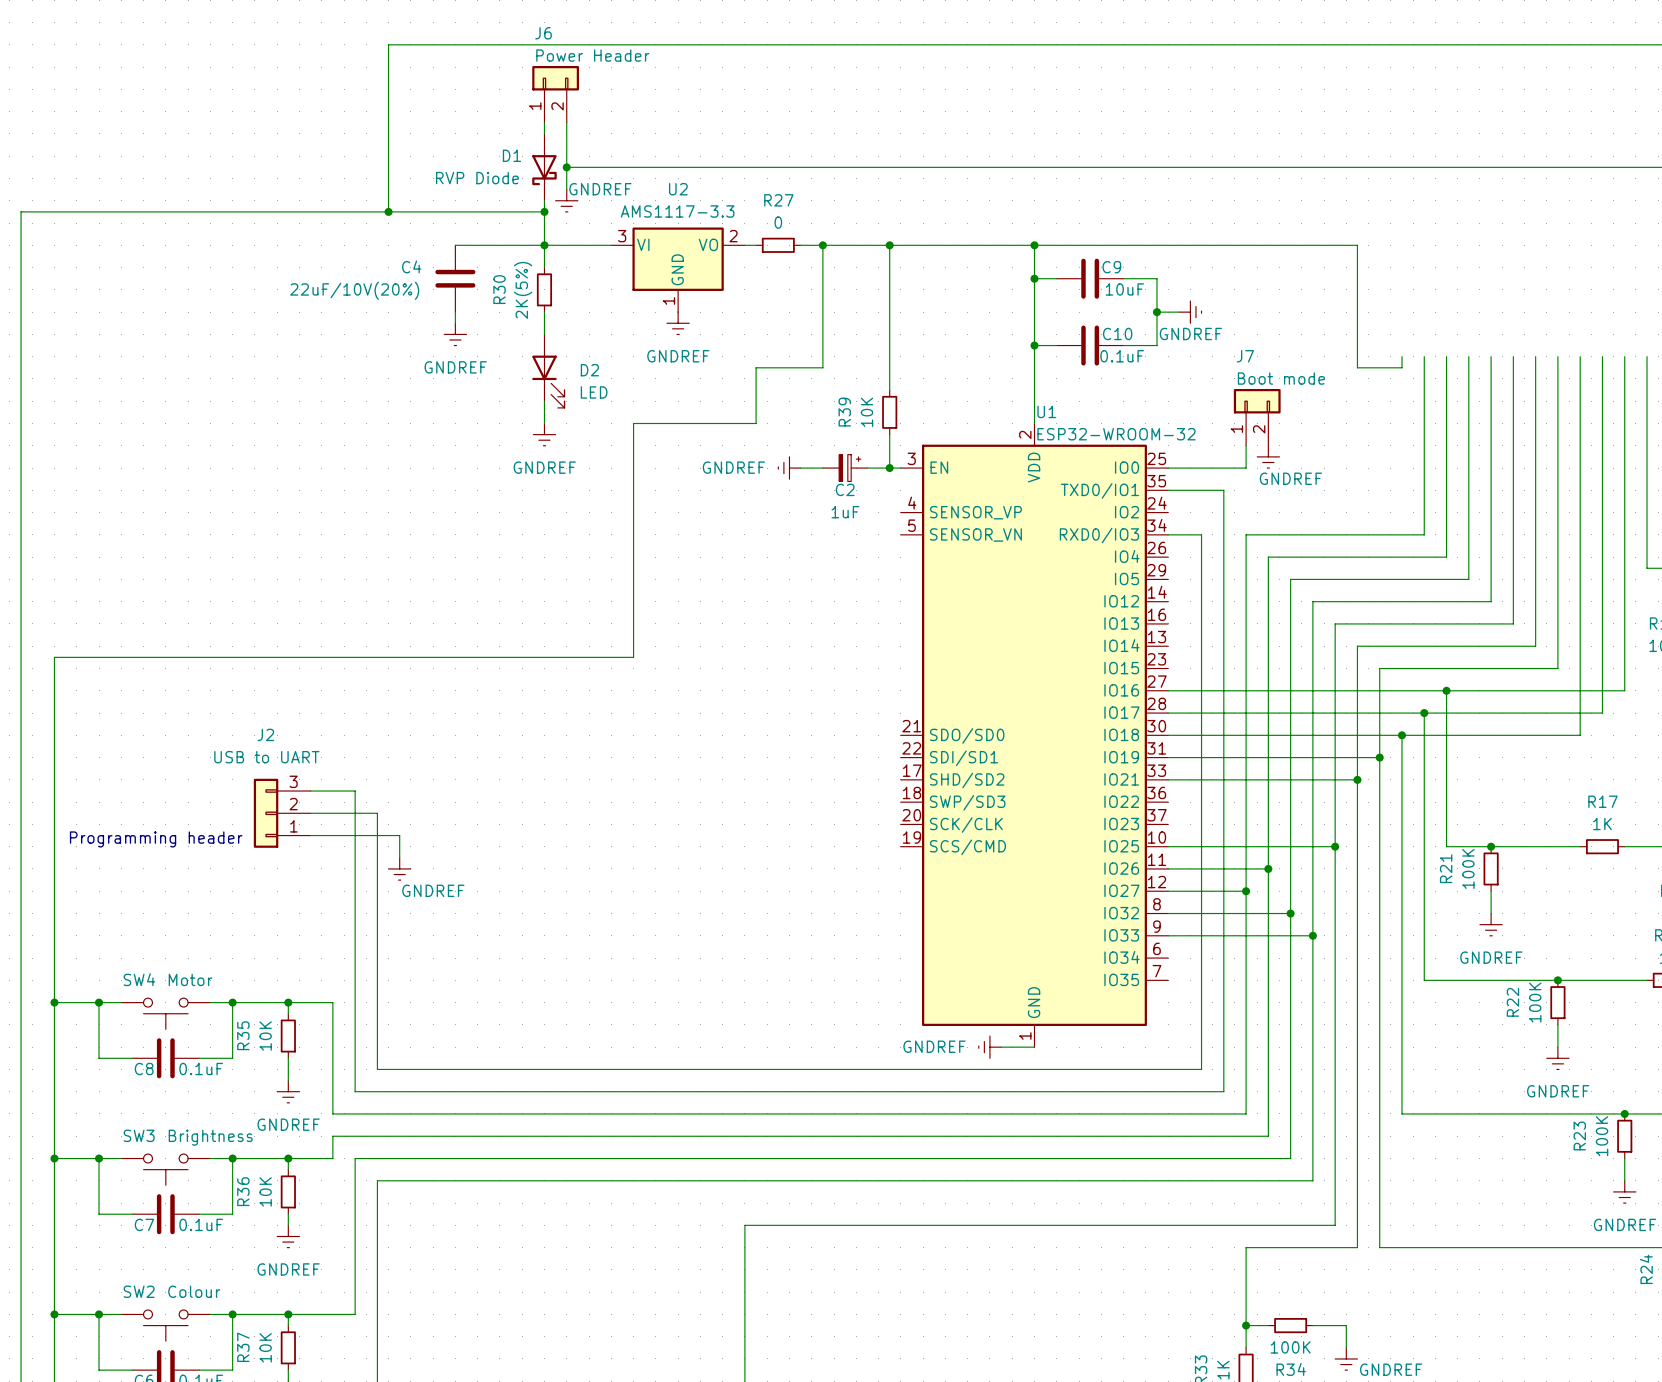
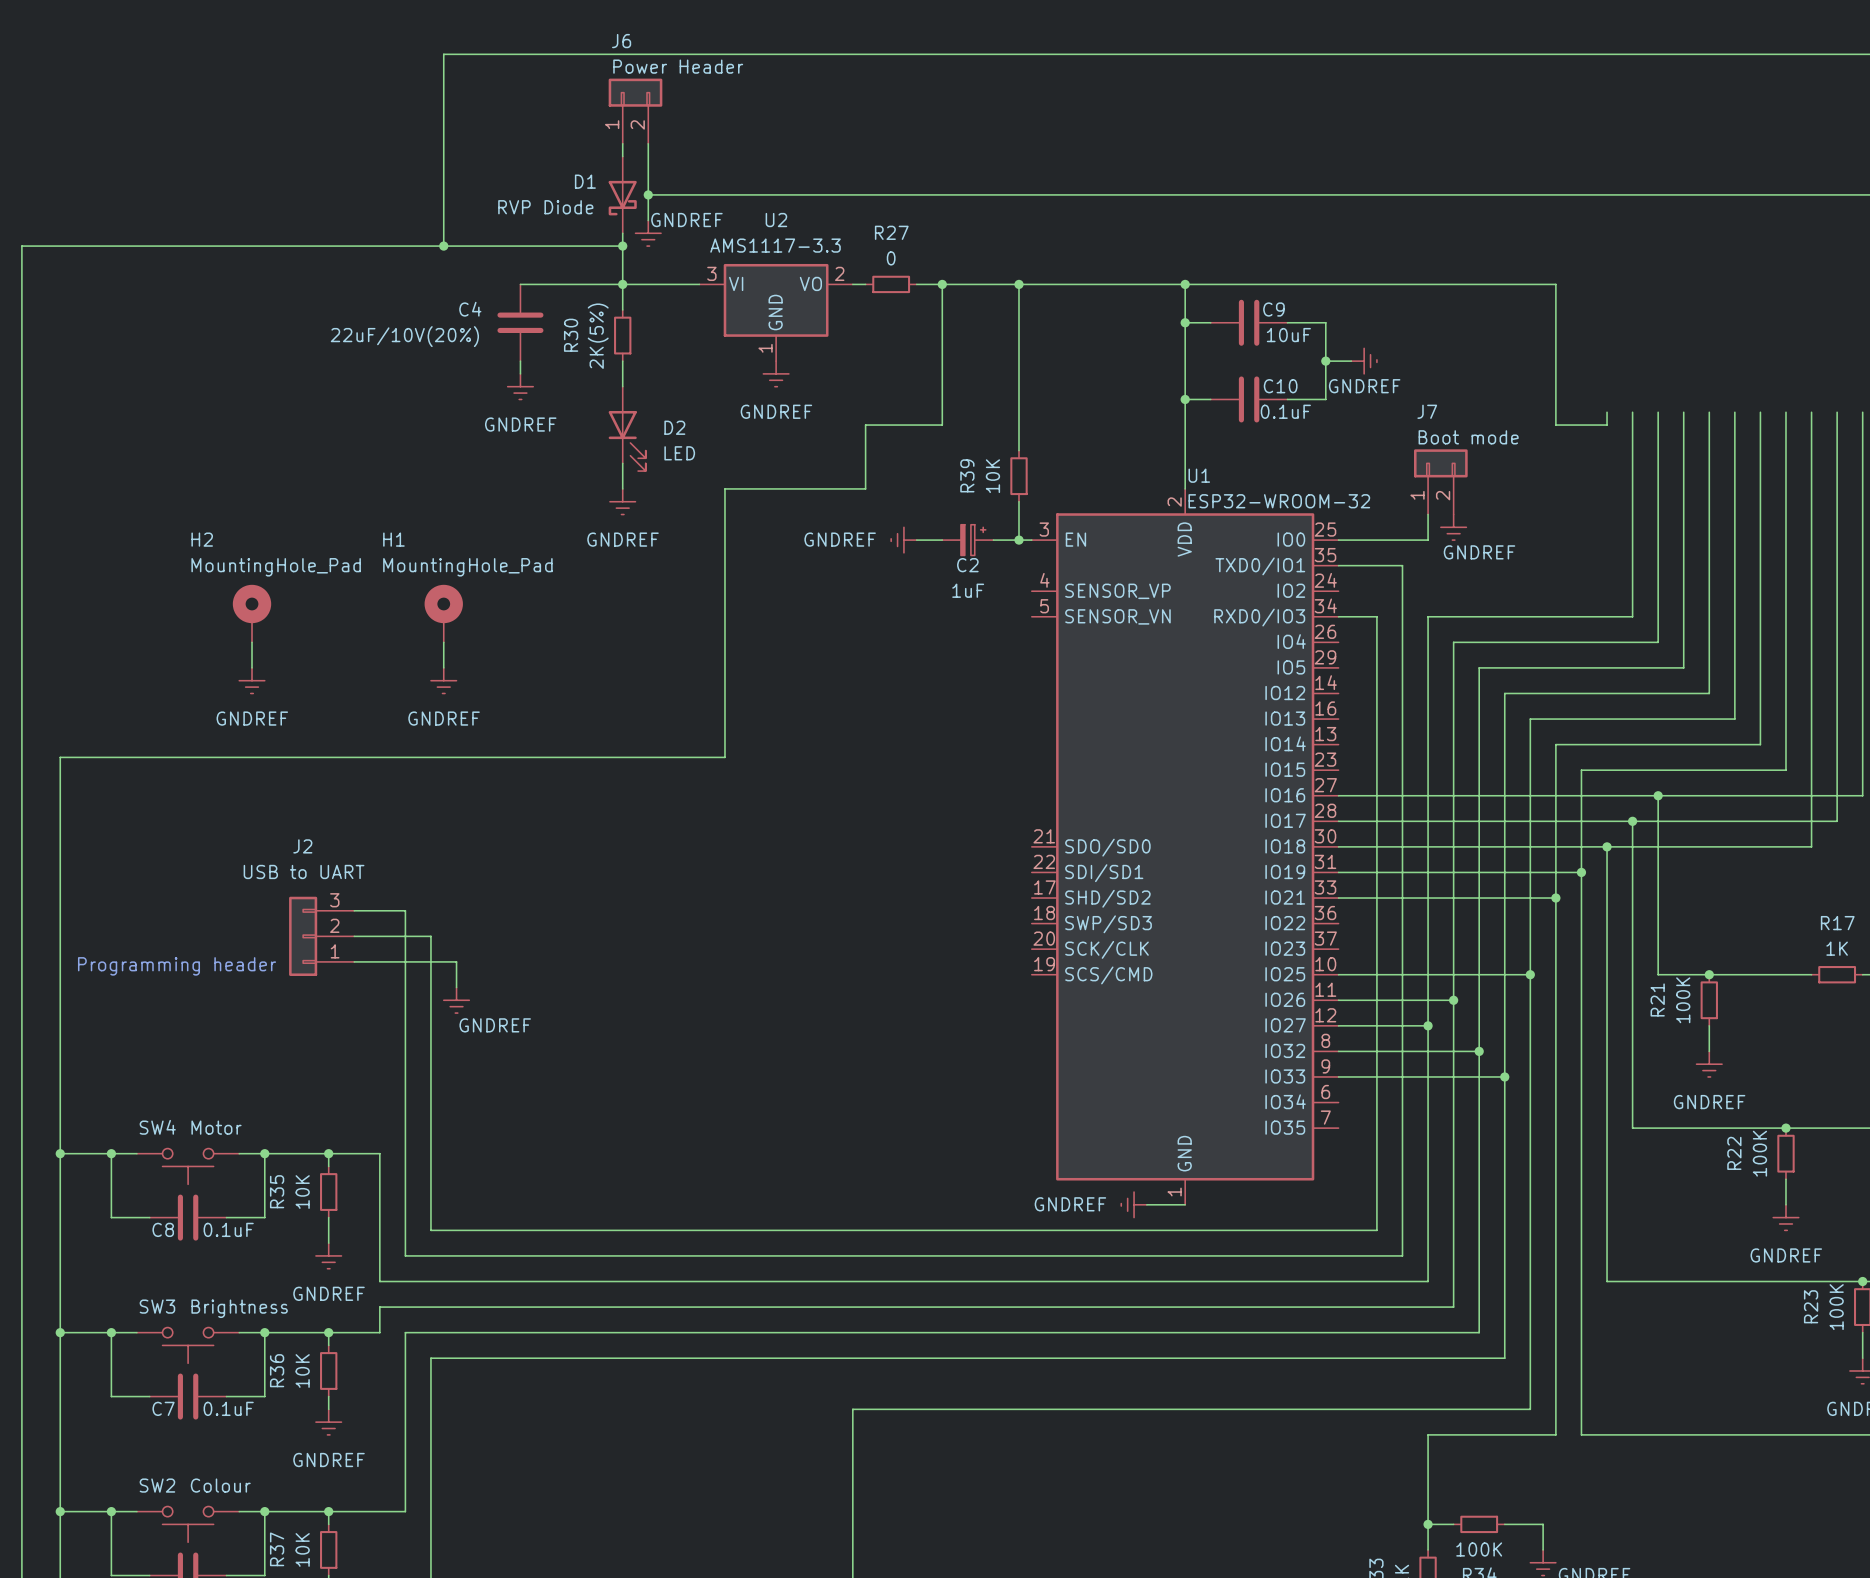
H2: none -> MountingHole_Pad (252, 613)
H1: none -> MountingHole_Pad (443, 613)
wire: none -> (252, 642) (252, 667)
wire: none -> (443, 642) (443, 667)
power symbol: none -> GNDREF (252, 680)
power symbol: none -> GNDREF (443, 680)

